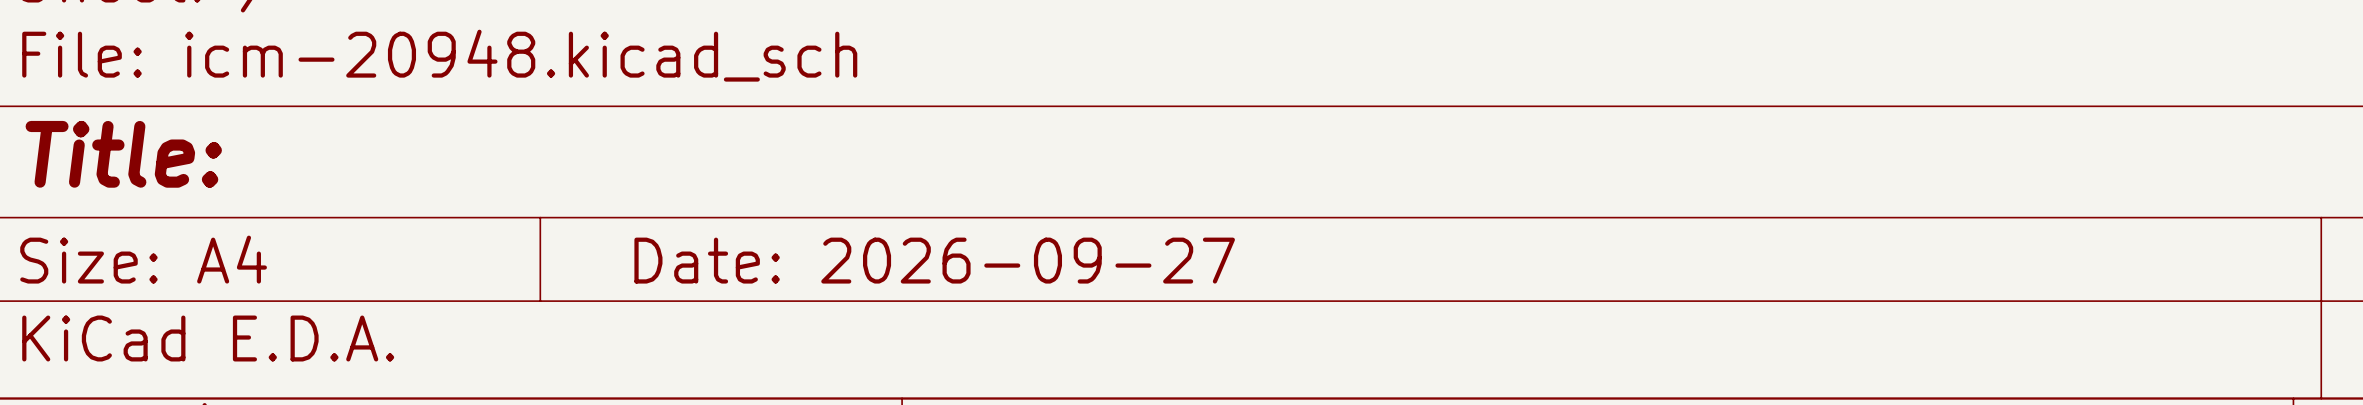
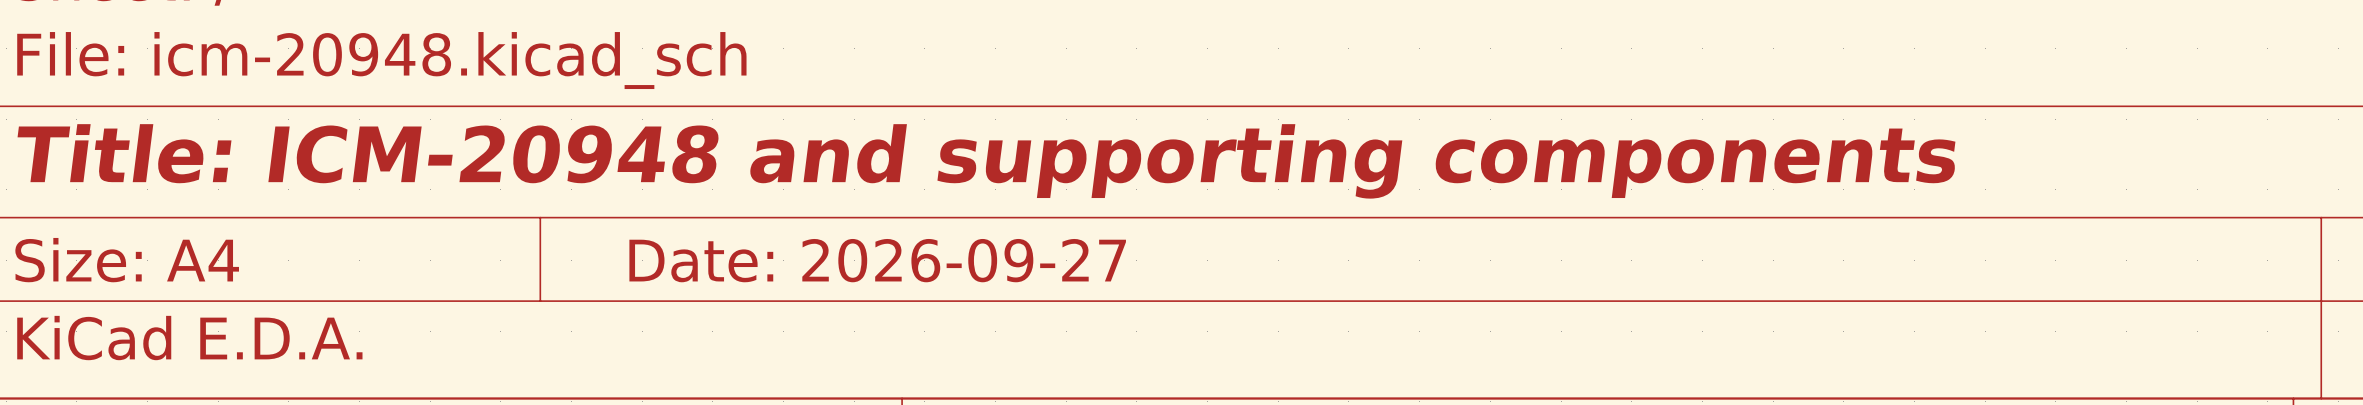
title block: Title: (123, 154) -> Title: ICM-20948 and supporting components (986, 161)

